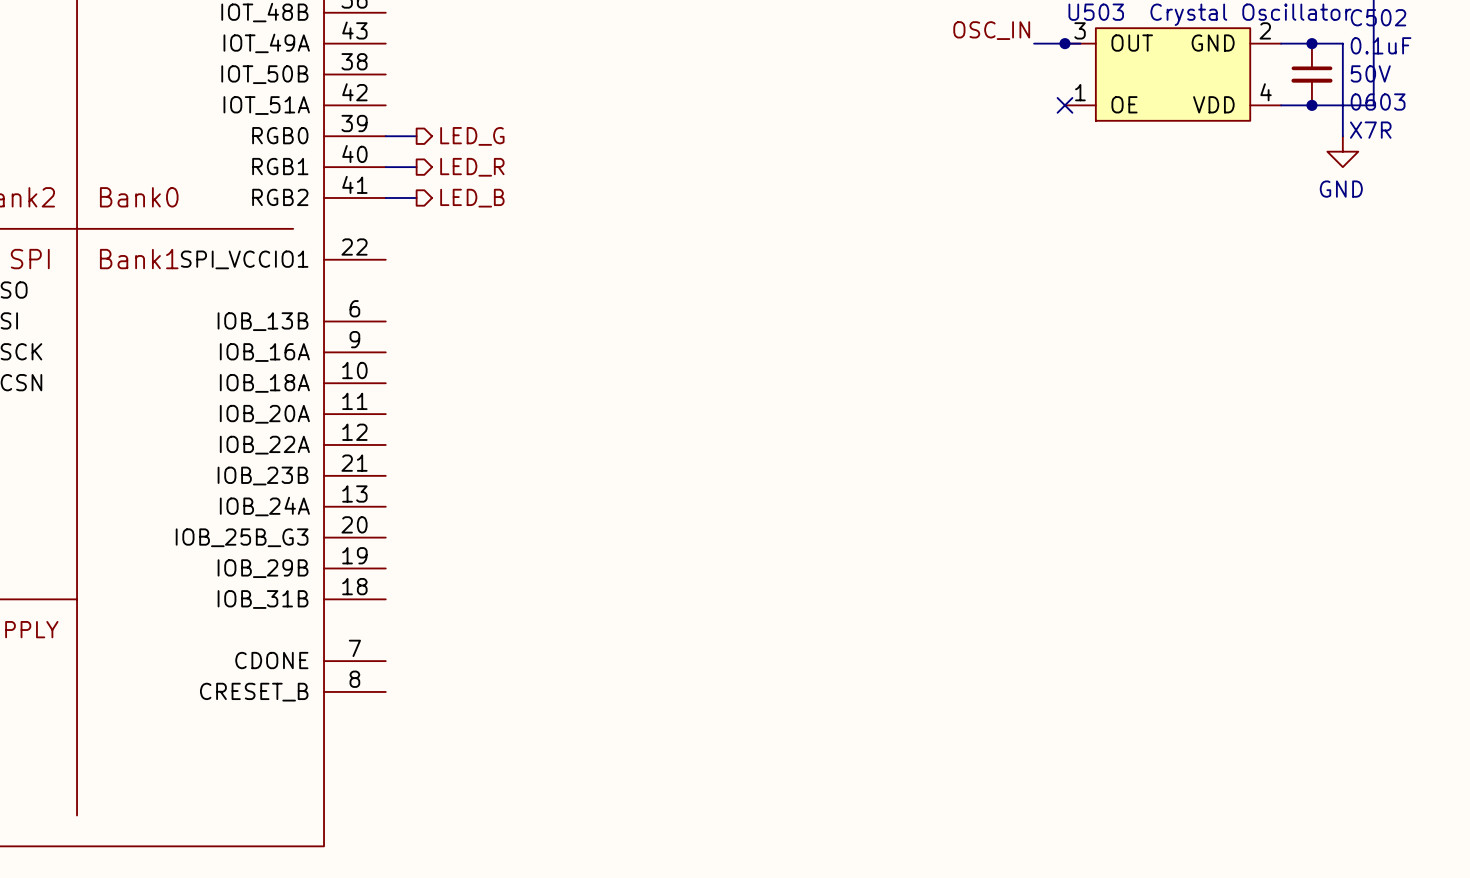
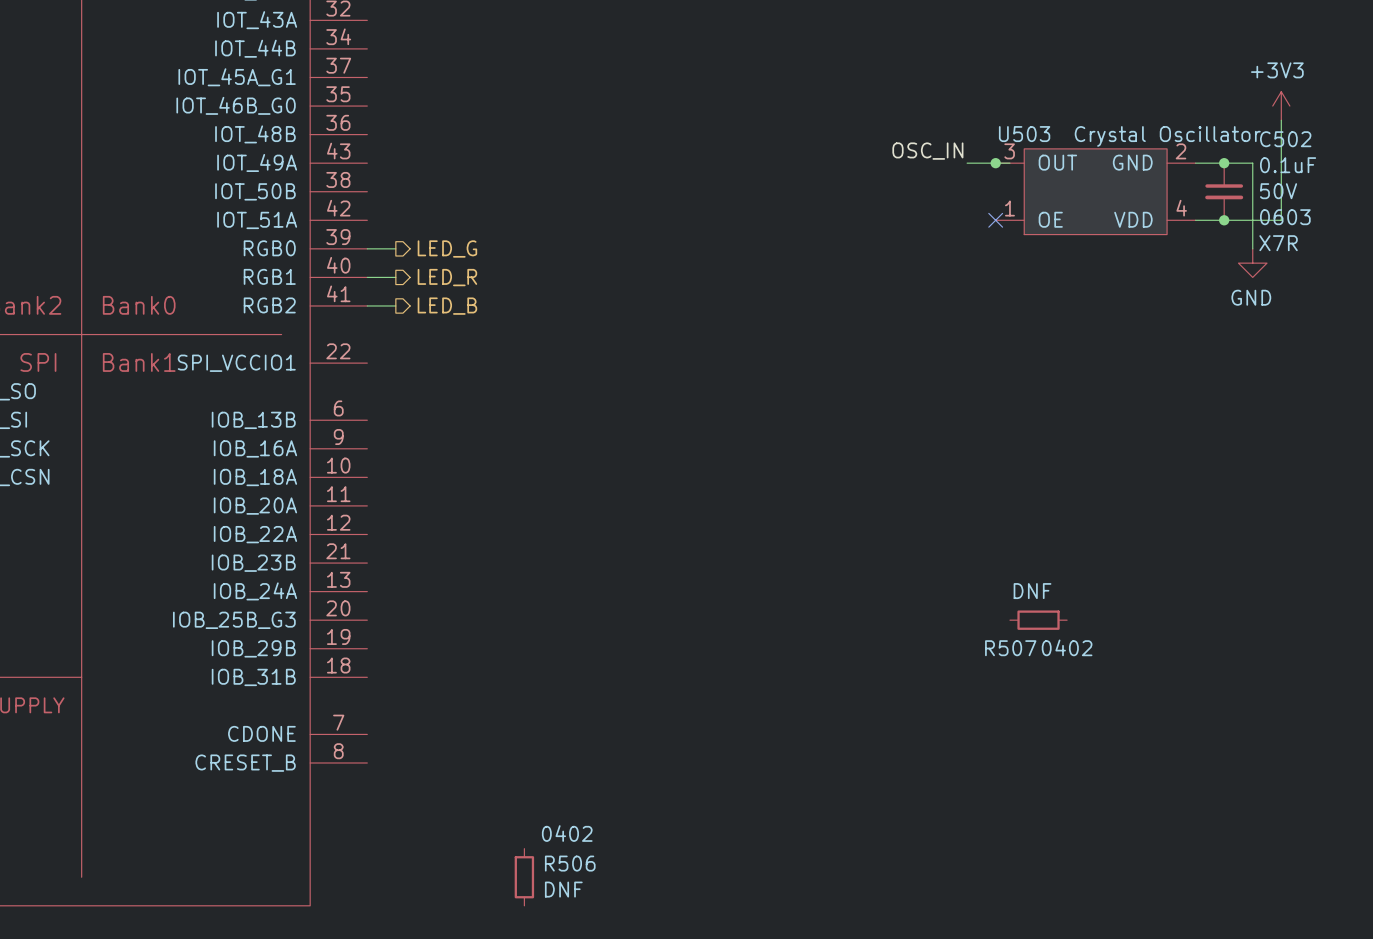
R507: none -> DNF (1038, 620)
R506: none -> DNF (524, 877)

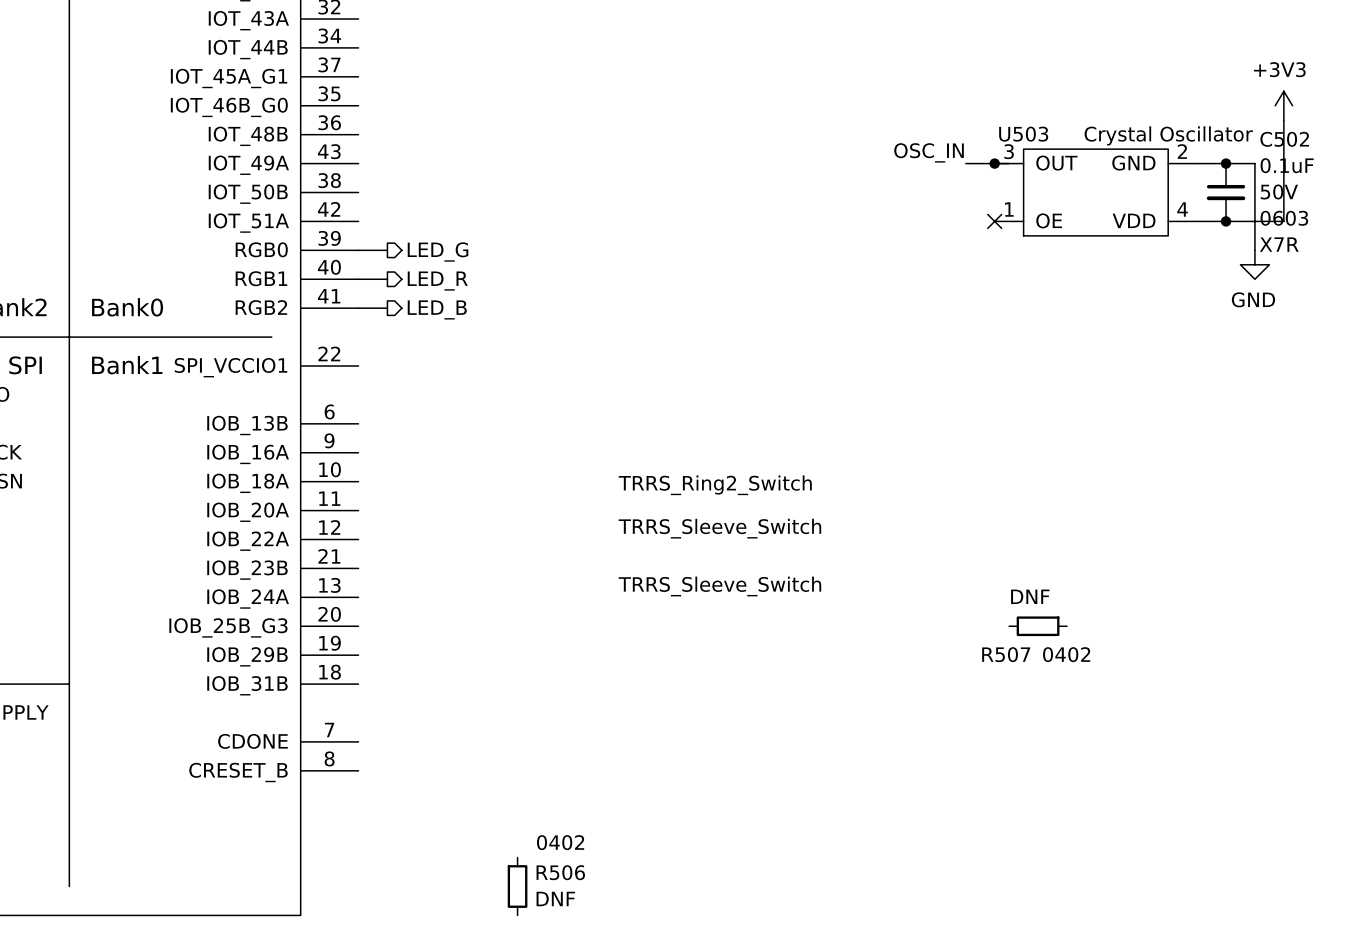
label: none -> TRRS_Ring2_Switch (715, 485)
label: none -> TRRS_Sleeve_Switch (719, 528)
label: none -> TRRS_Sleeve_Switch (719, 586)

